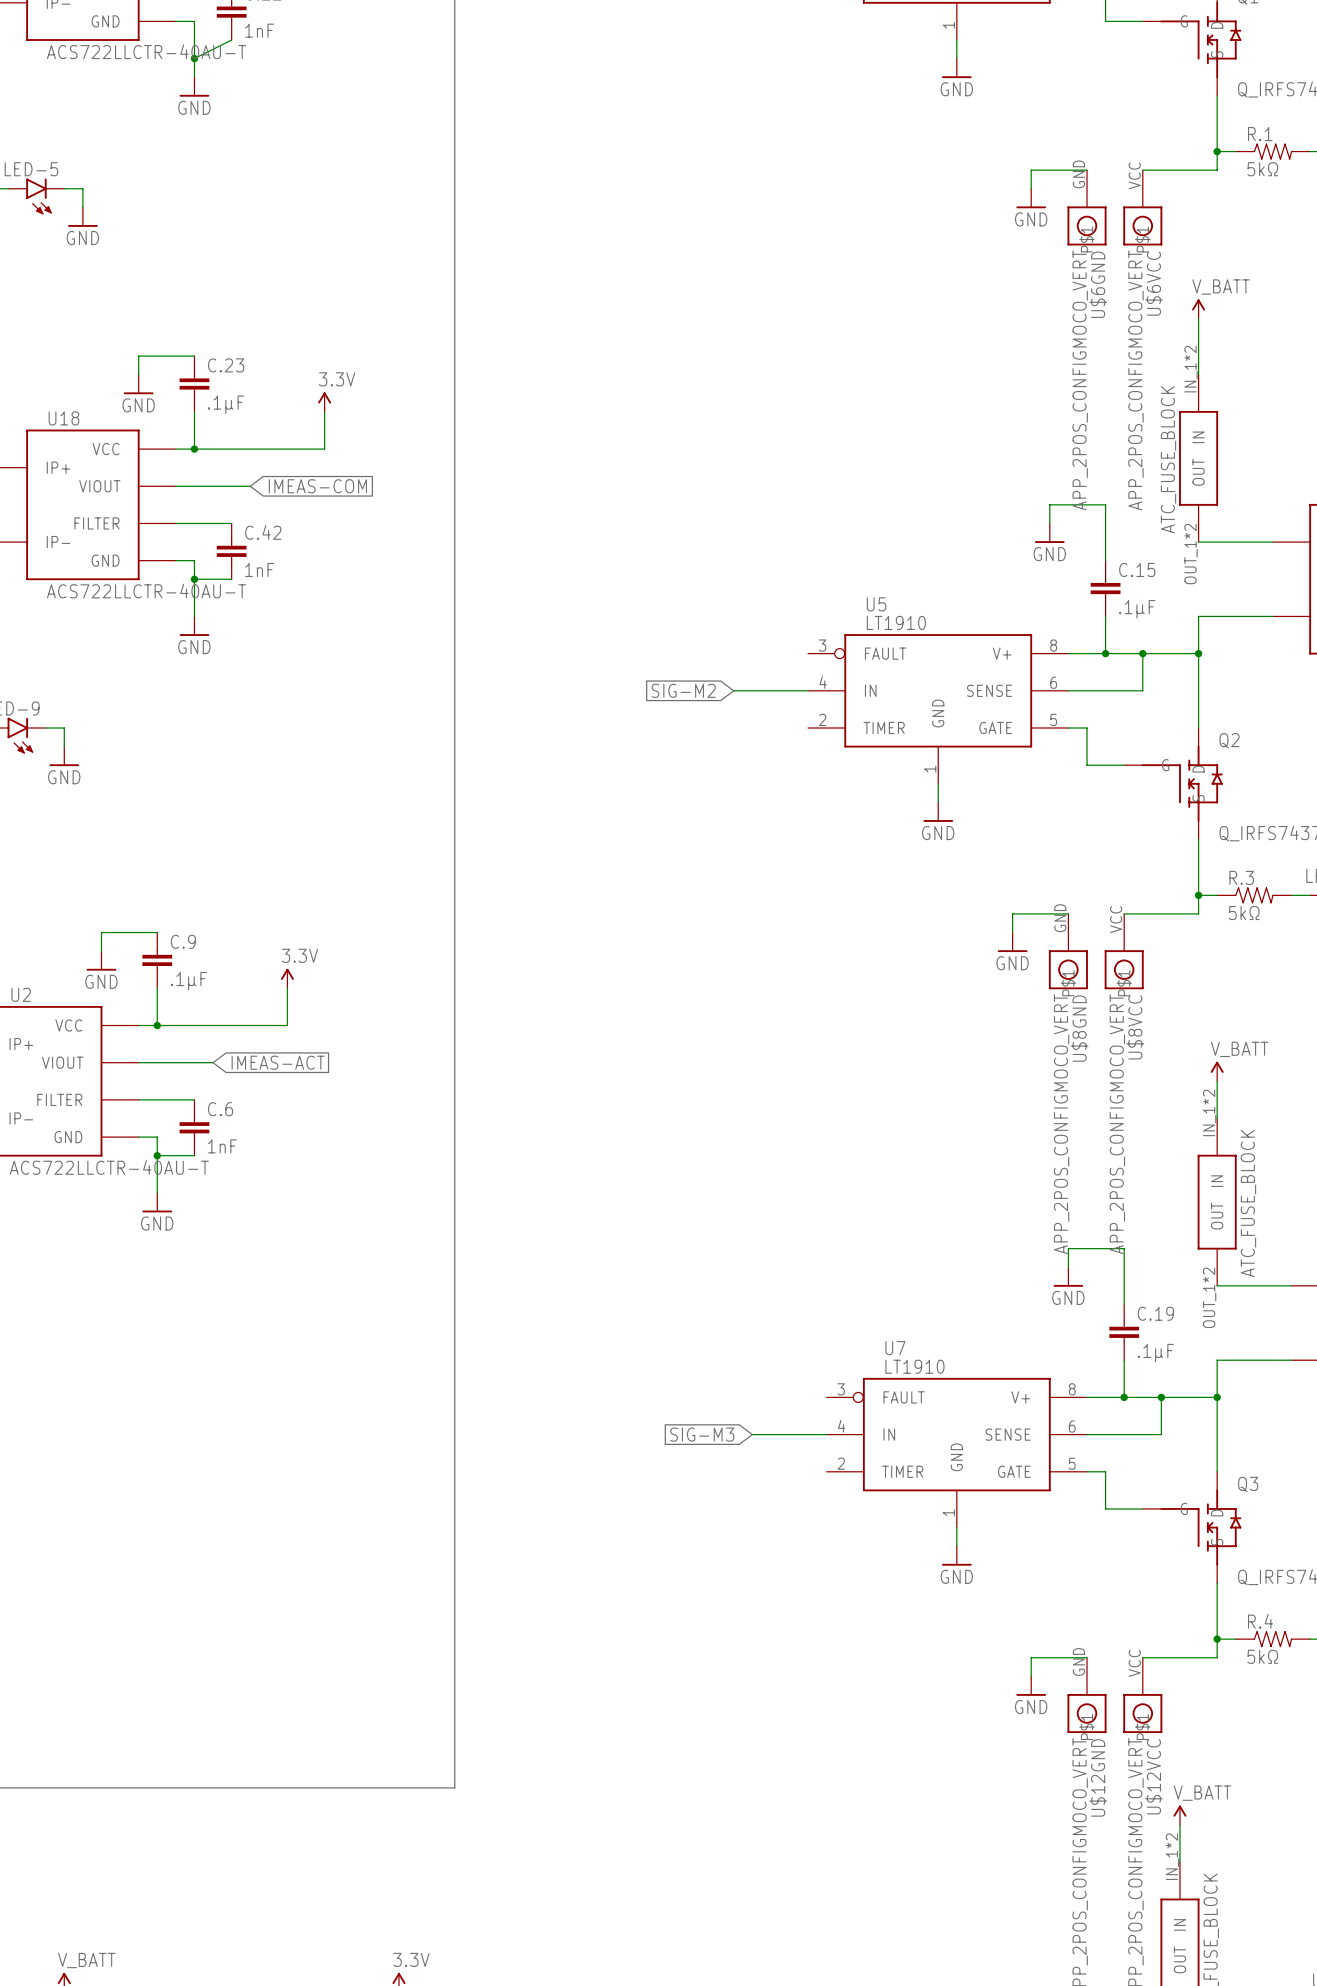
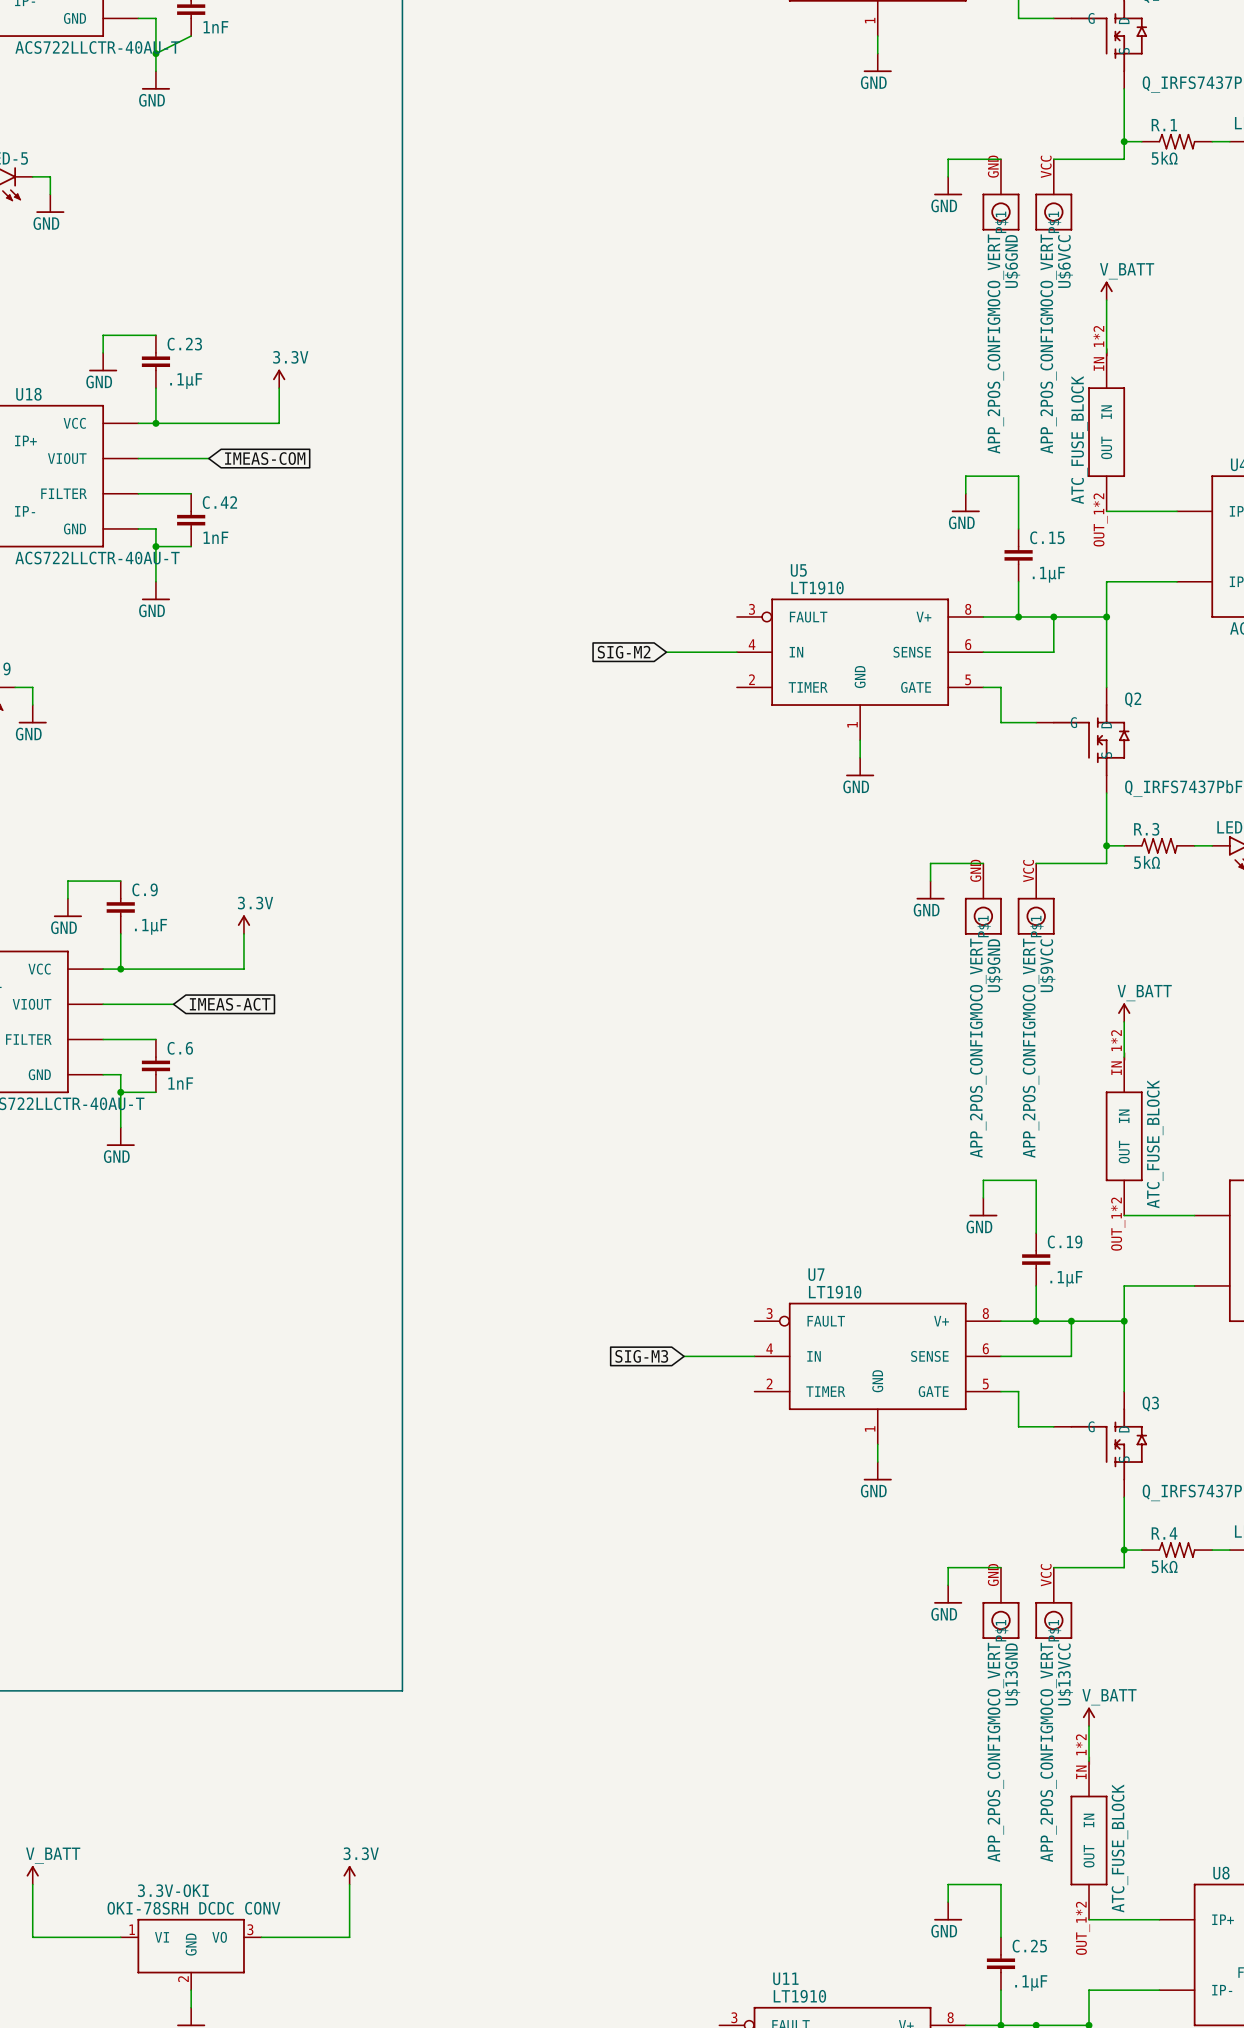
U$8VCC name: U$8VCC (1135, 1027) -> U$9VCC (1047, 965)
U$8GND name: U$8GND (1079, 1028) -> U$9GND (994, 965)
U$12VCC name: U$12VCC (1153, 1776) -> U$13VCC (1065, 1674)
U$12GND name: U$12GND (1098, 1777) -> U$13GND (1012, 1674)

